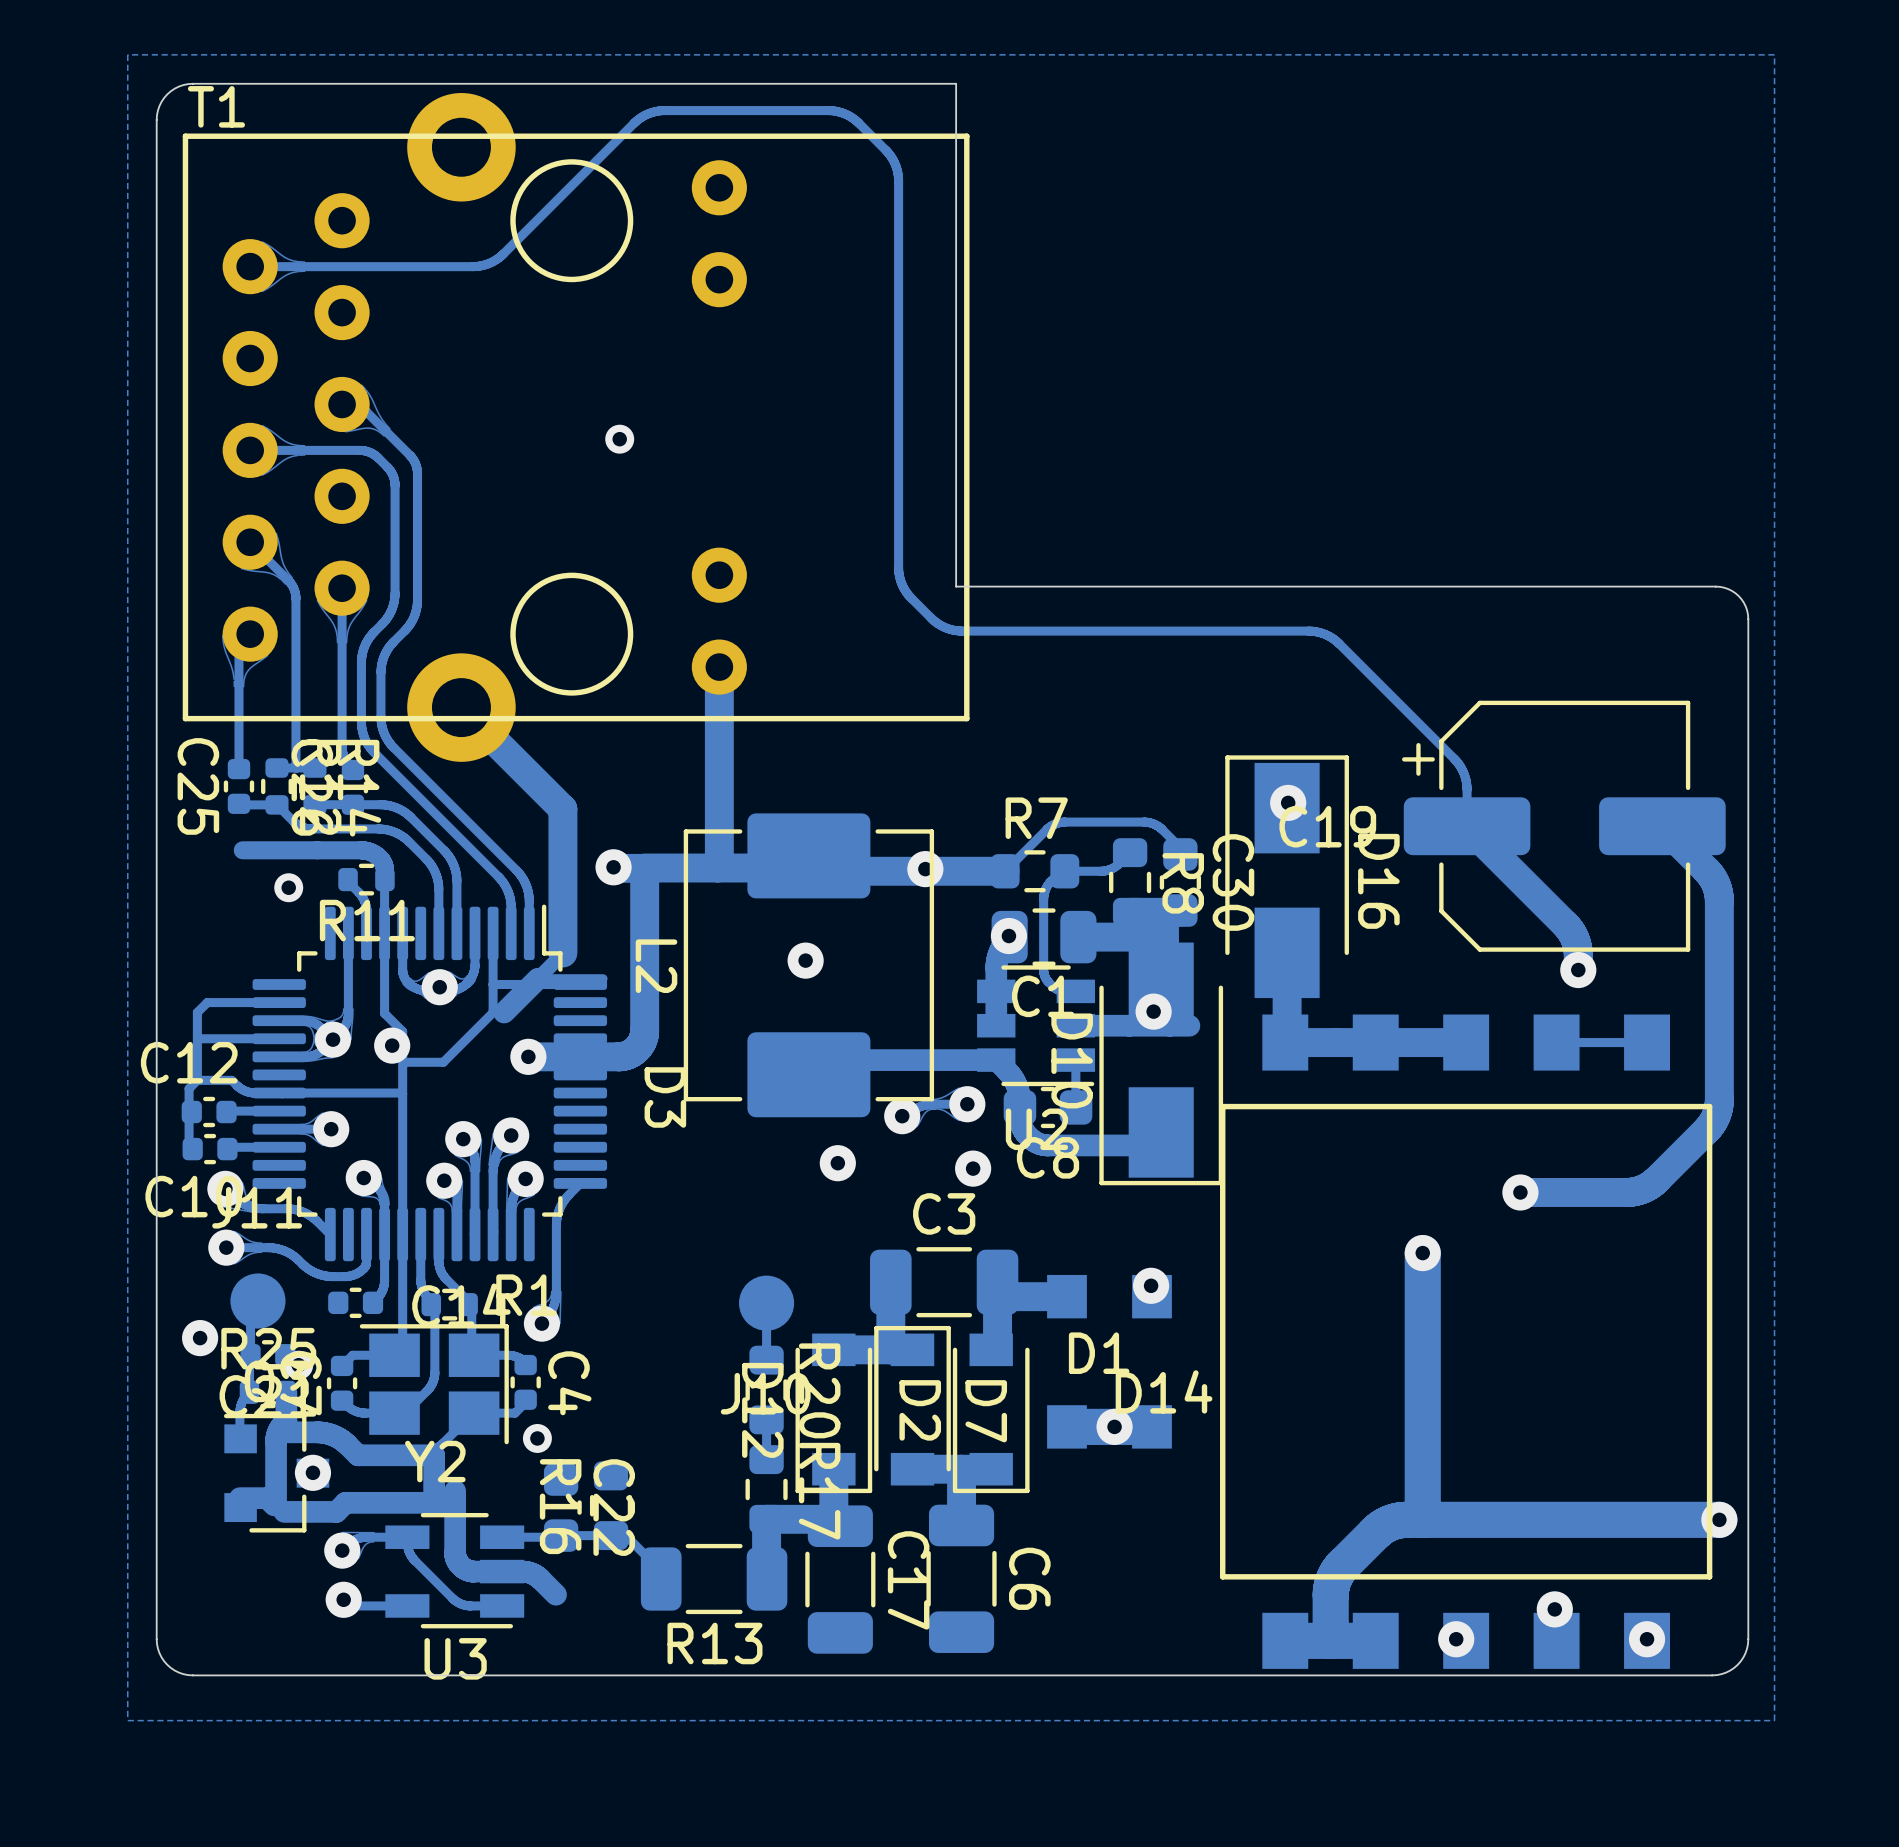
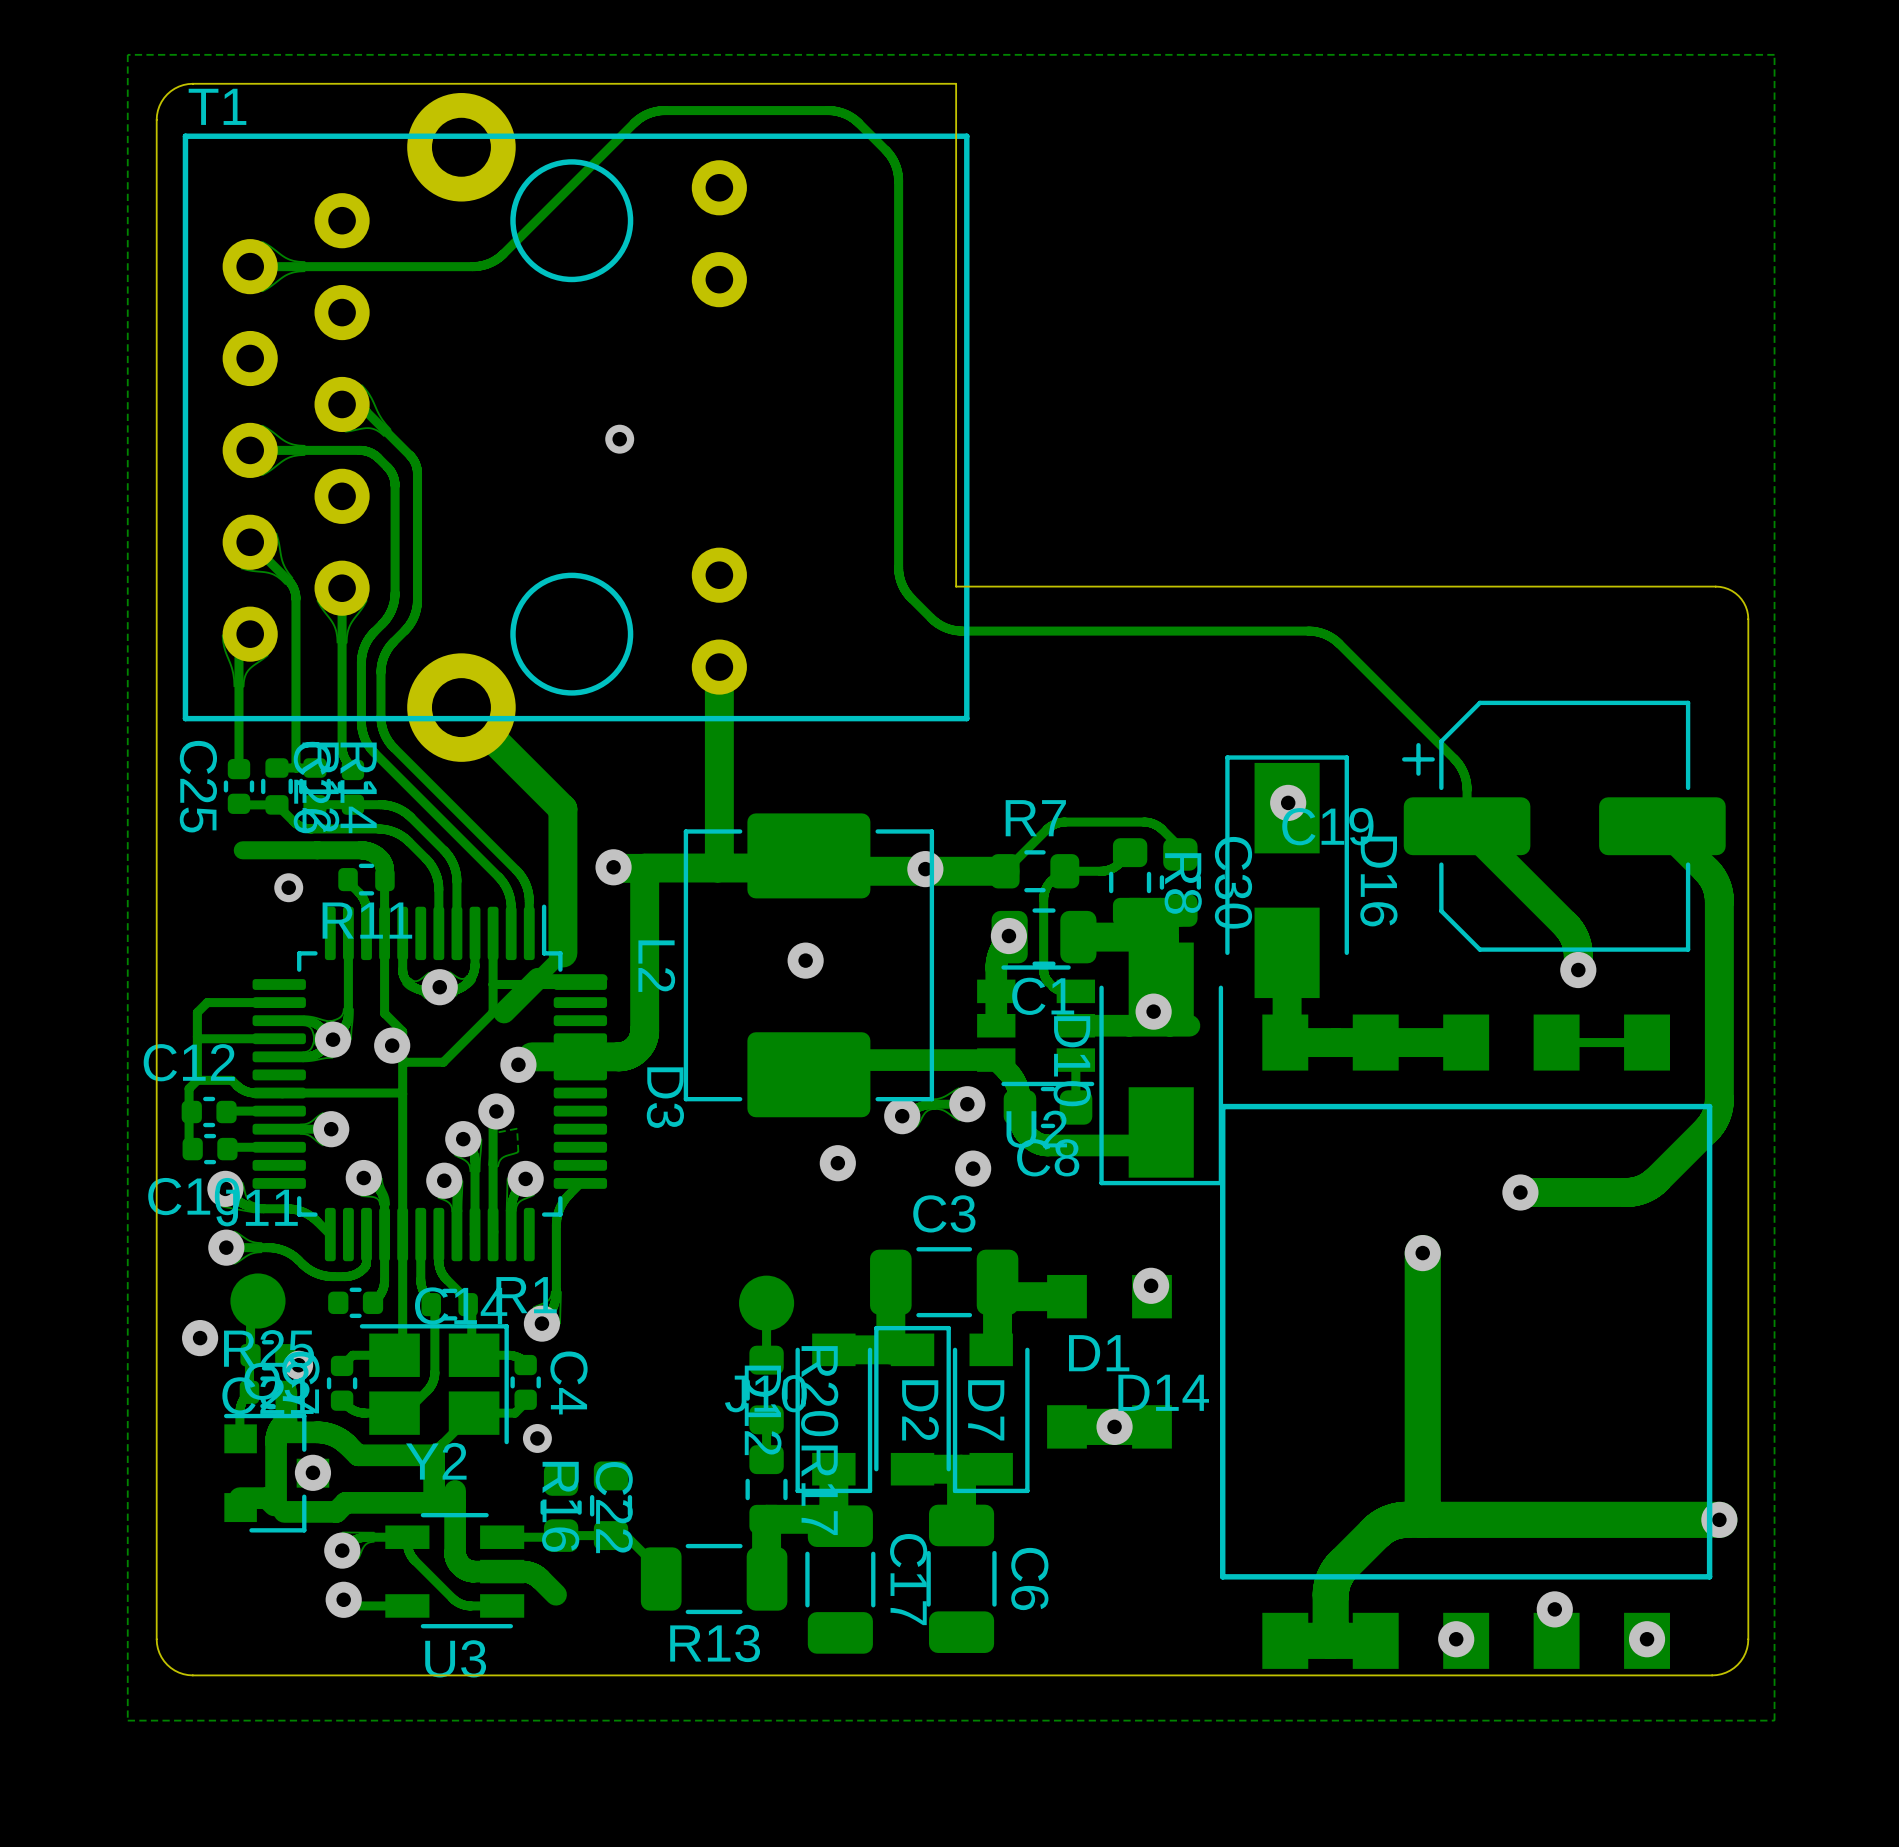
via position: (528, 1056) -> (518, 1064)
track: (511, 1135) (497, 1153) (493, 1171) -> (496, 1111) (493, 1114) (493, 1171)
via position: (511, 1135) -> (496, 1111)

